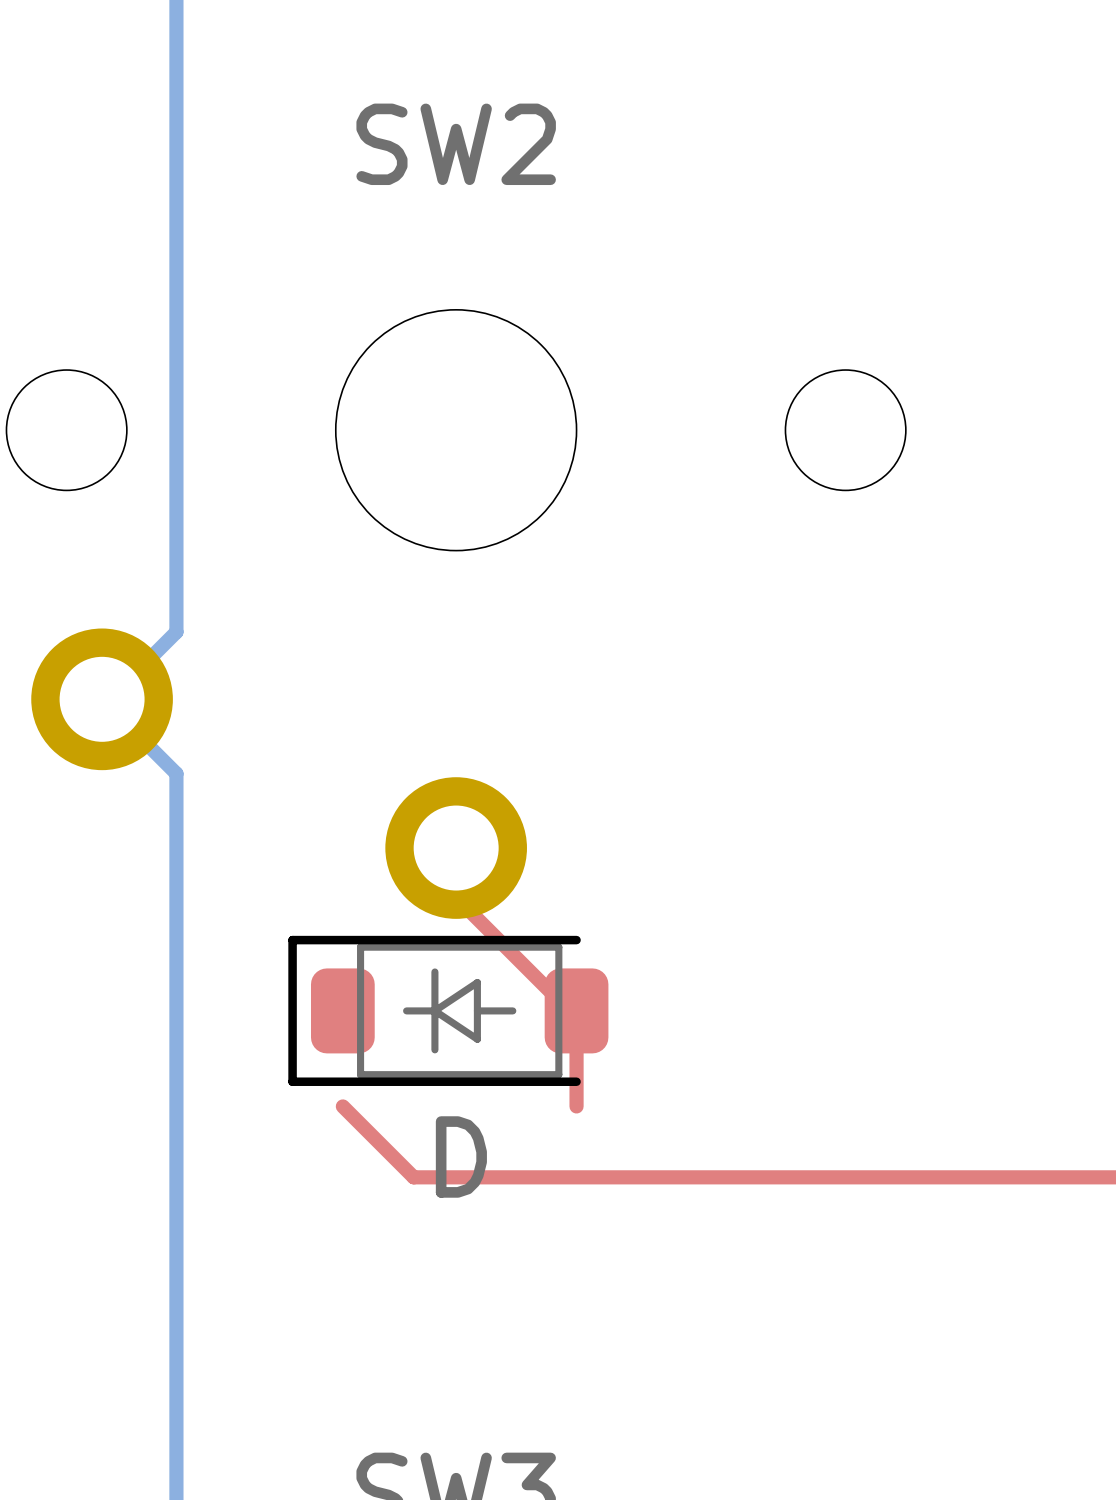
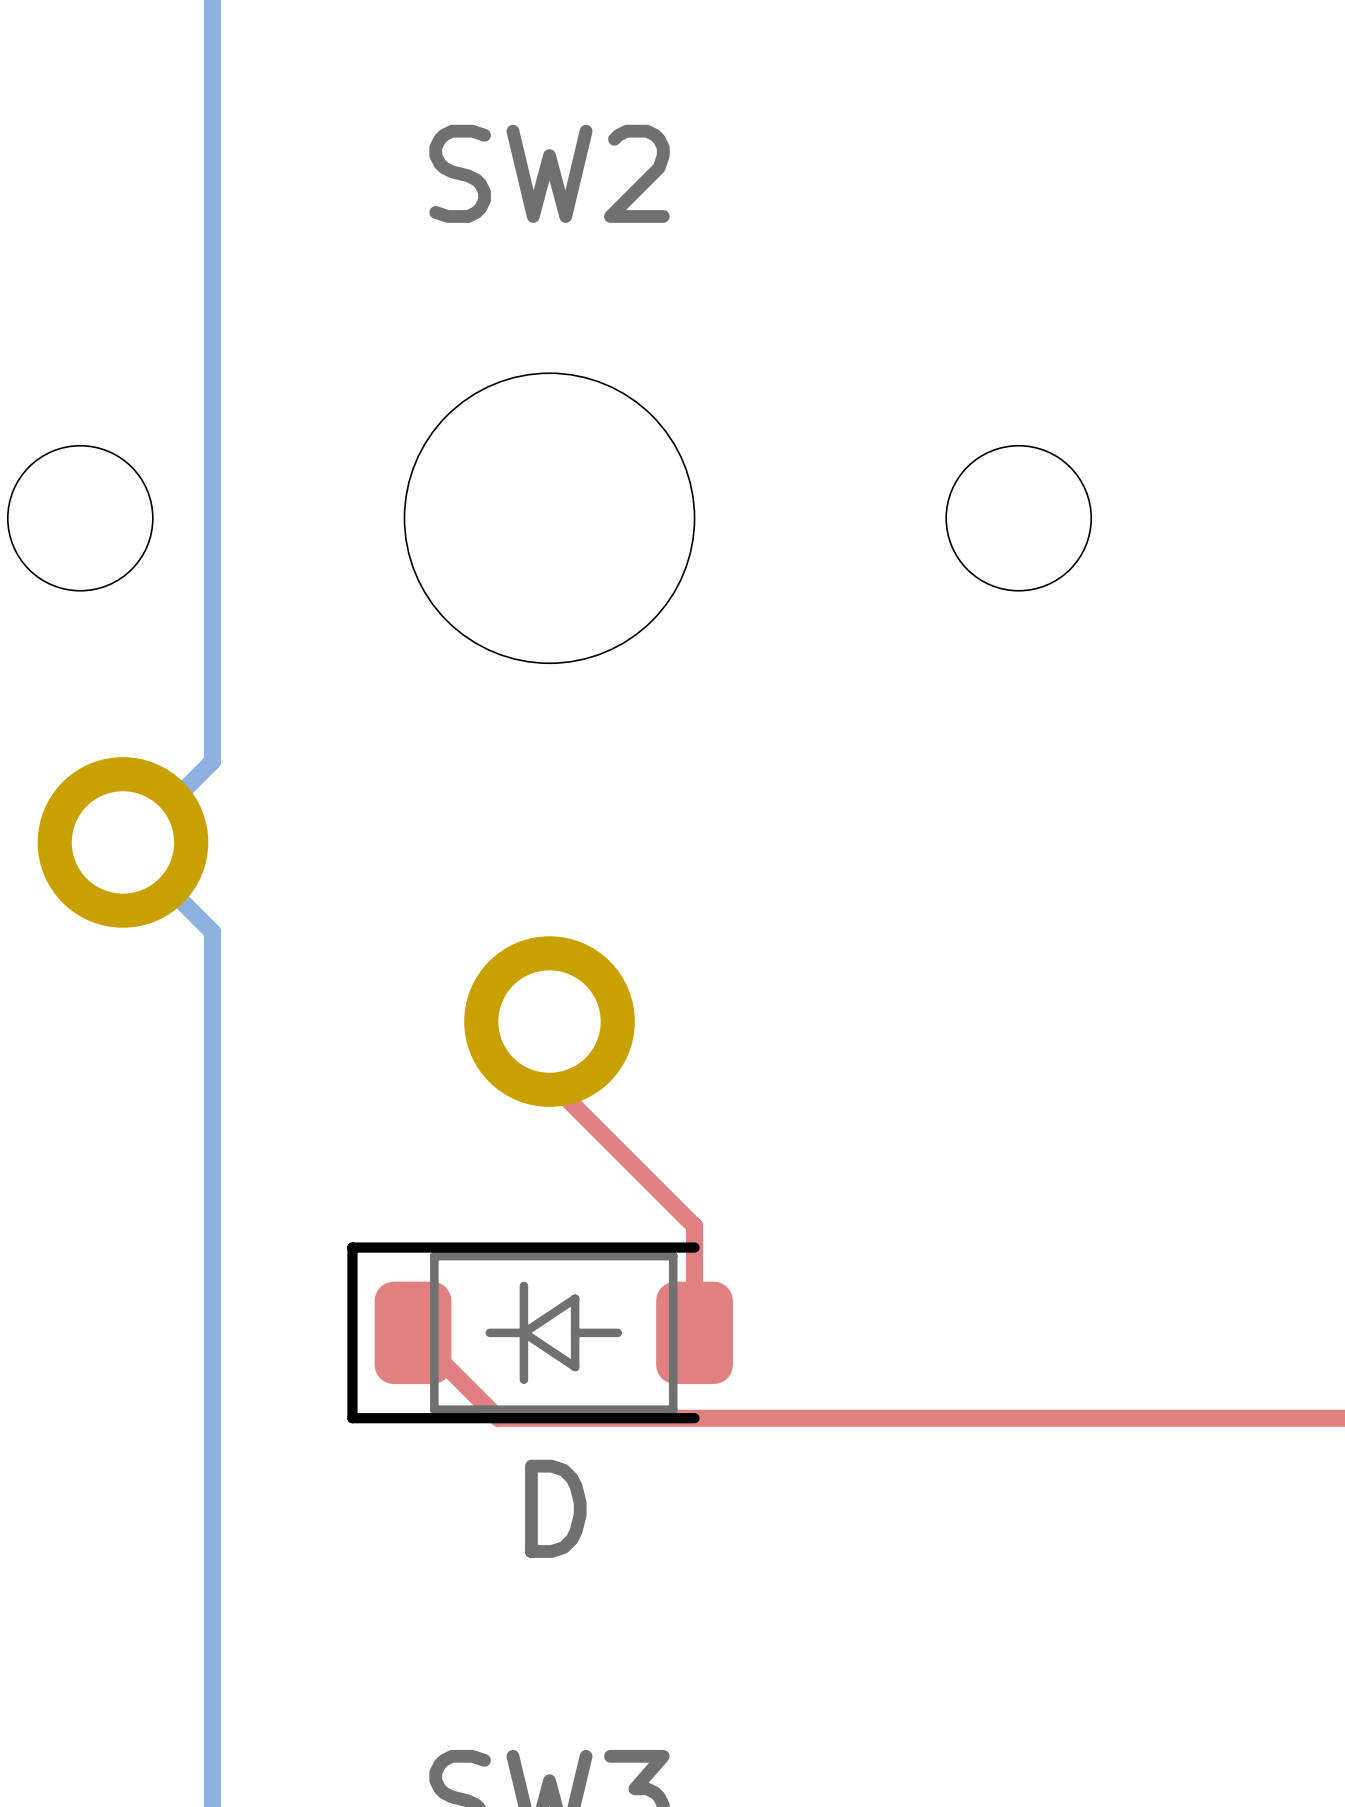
part position: (448, 1010) -> (540, 1332)

